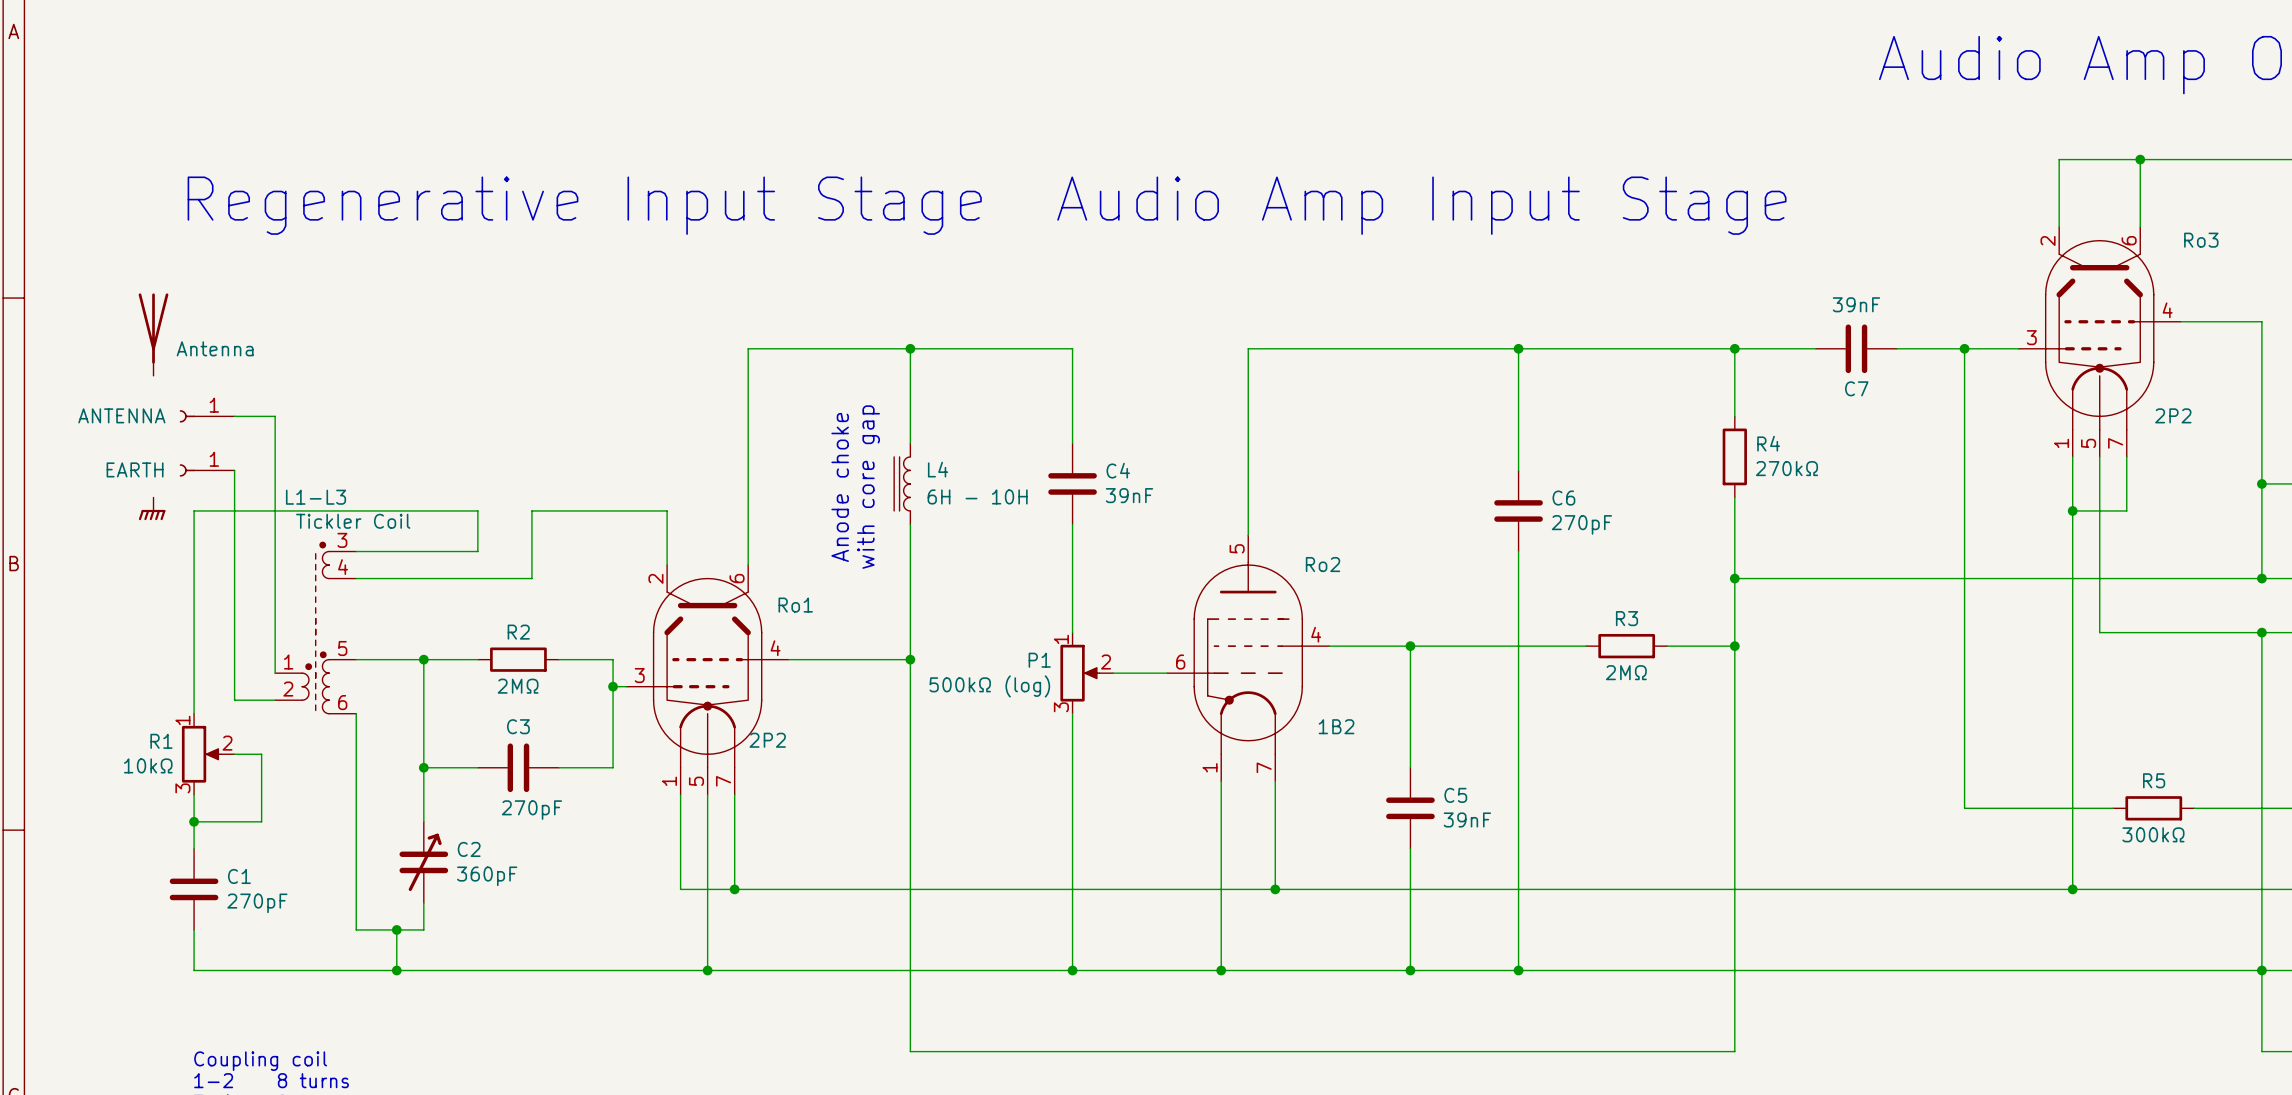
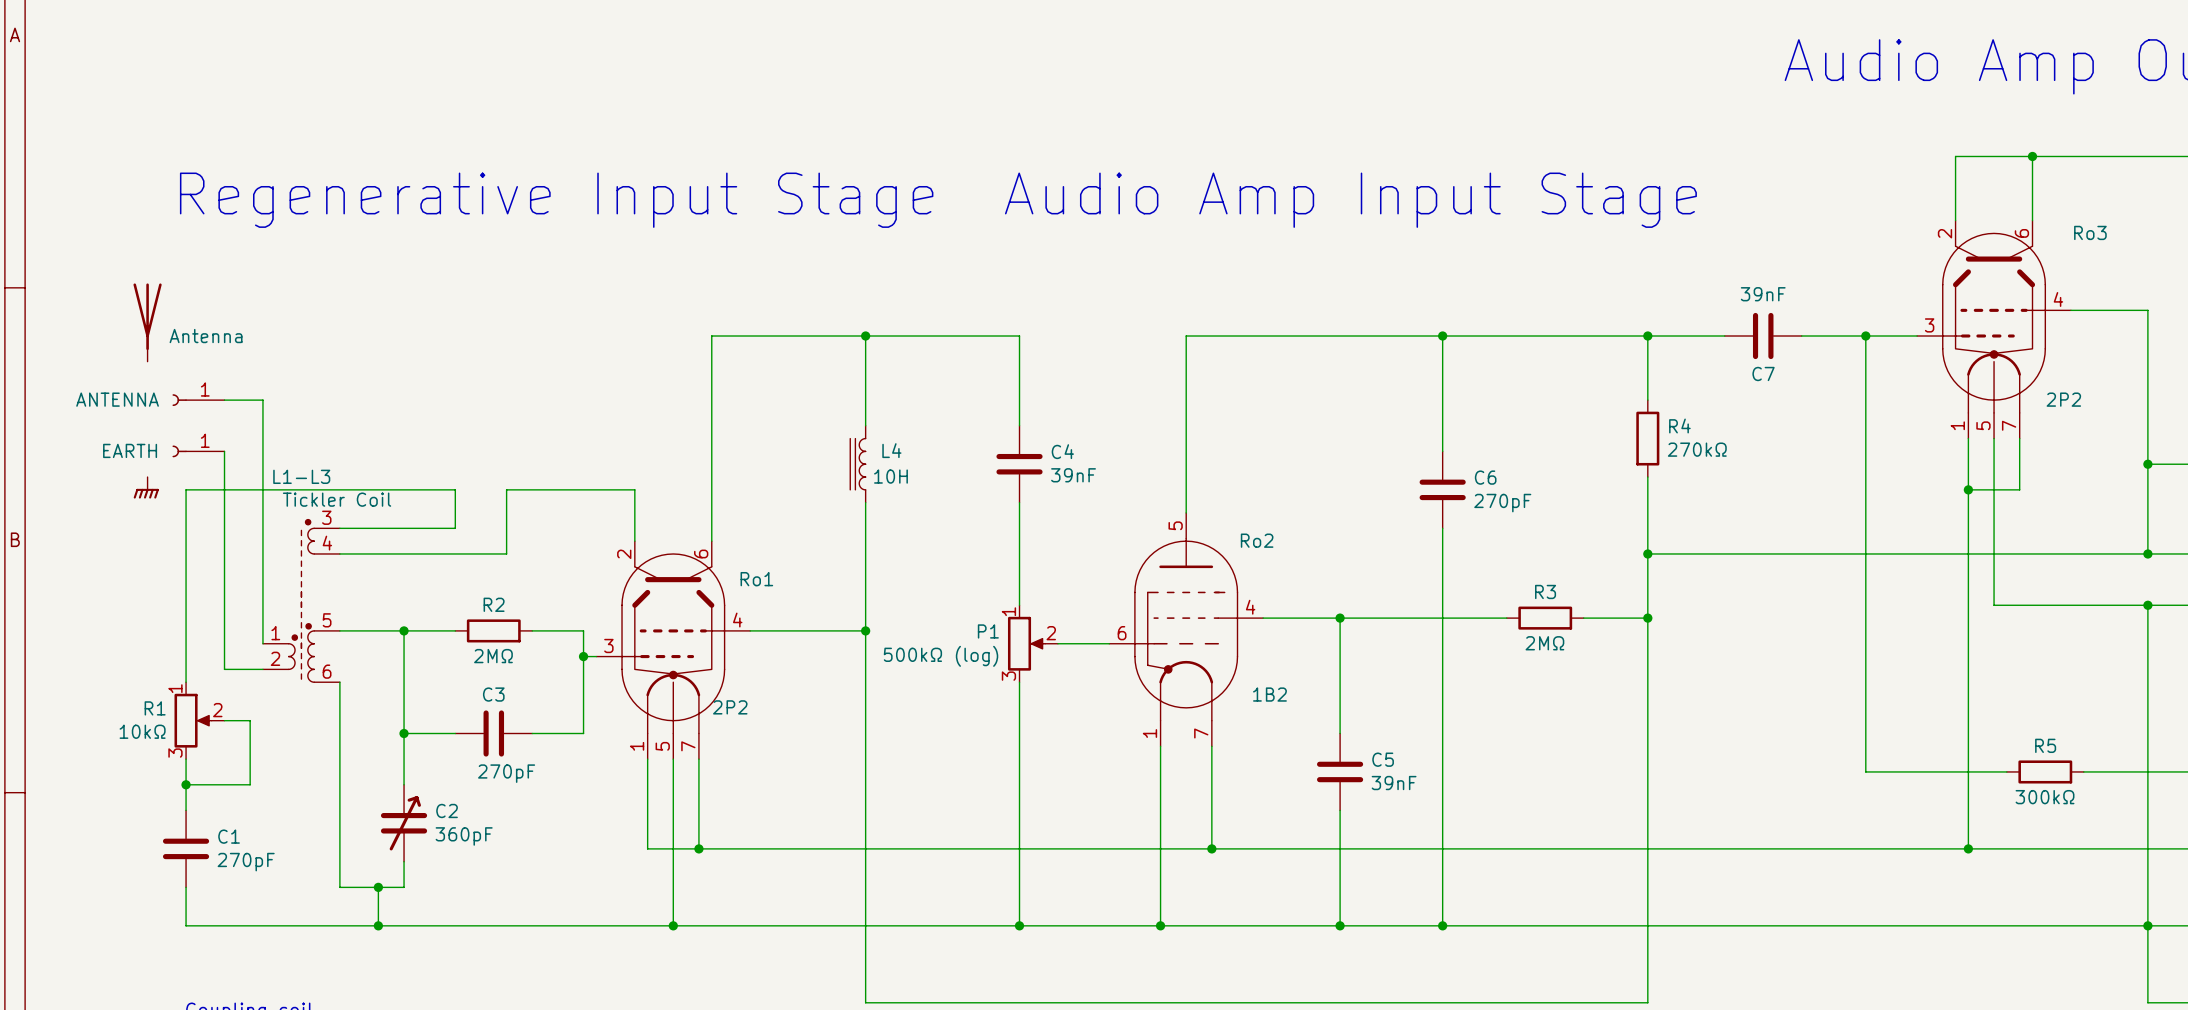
text: Anode choke (840, 487) -> none
text: with core gap (868, 487) -> none
L4 value: 6H - 10H (977, 496) -> 10H (890, 476)

